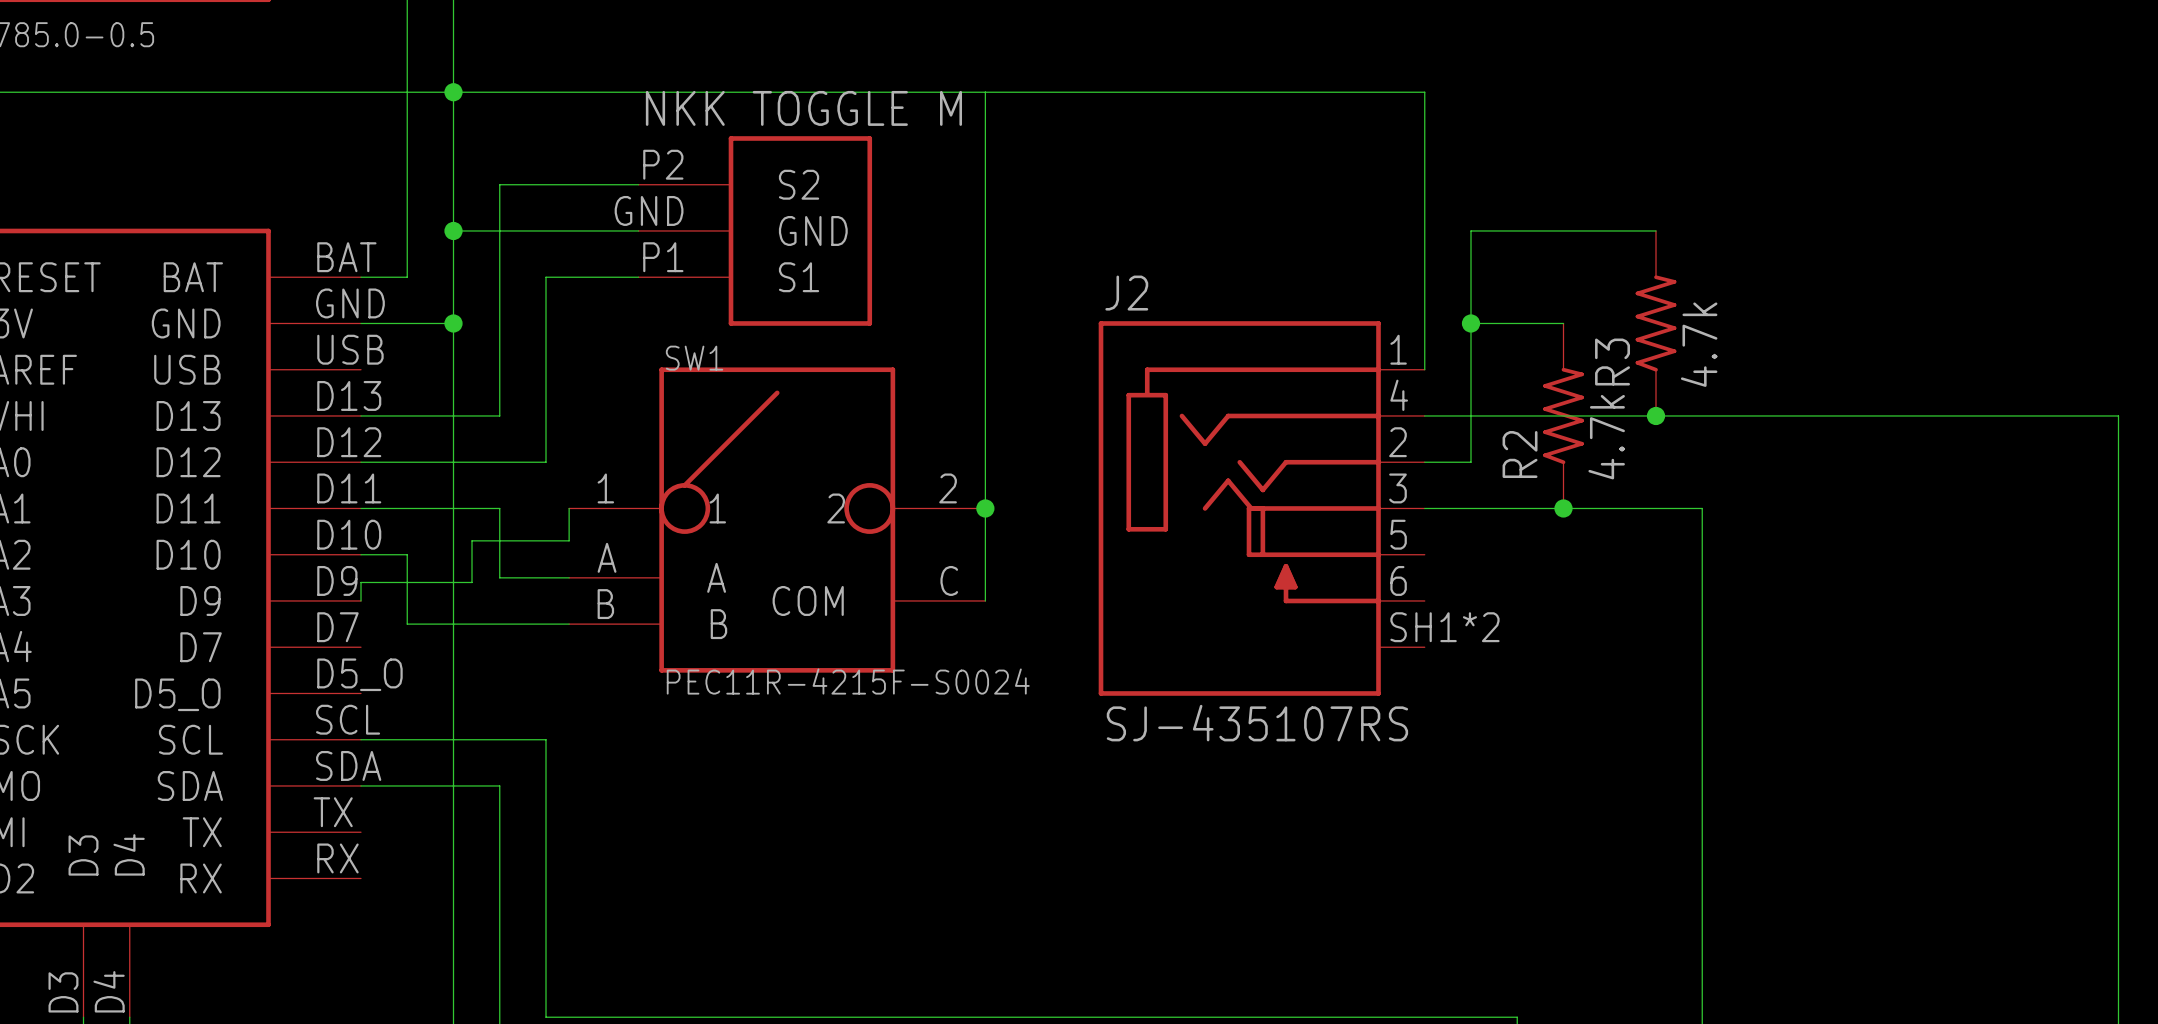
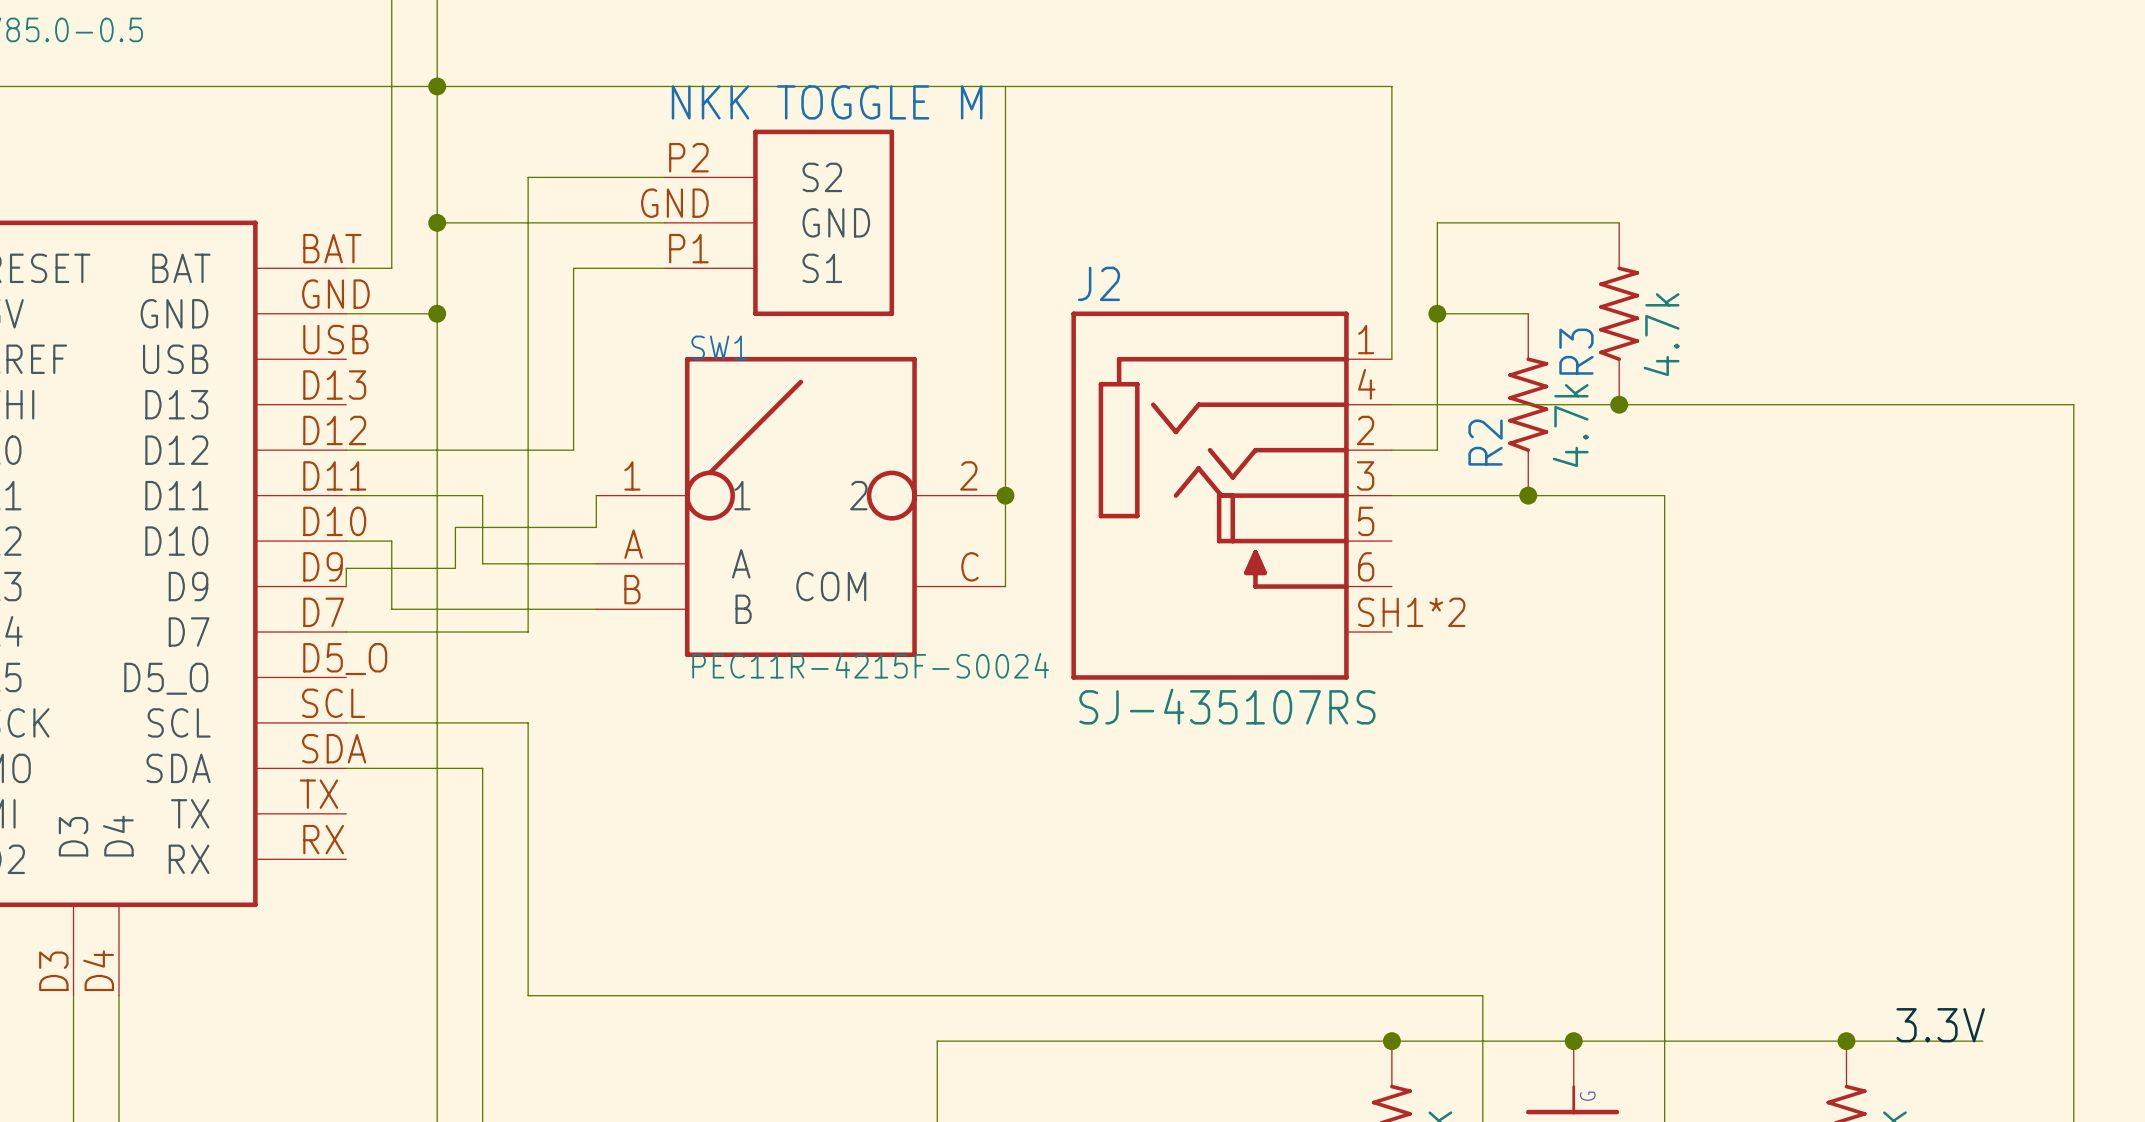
wire: (985, 92) (985, 600) -> (1005, 86) (1005, 586)
wire: (546, 184) (499, 184) (499, 415) (361, 415) -> none
part position: (755, 230) -> (779, 222)
wire: (546, 277) (592, 277) -> (528, 268) (528, 177)
wire: none -> (573, 268) (573, 450) (528, 450) (528, 632) (346, 632)
wire: (569, 508) (569, 540) -> (596, 495) (596, 527) (550, 527)
junction position: (985, 508) -> (1005, 495)
SW1 position: (777, 520) -> (800, 506)

